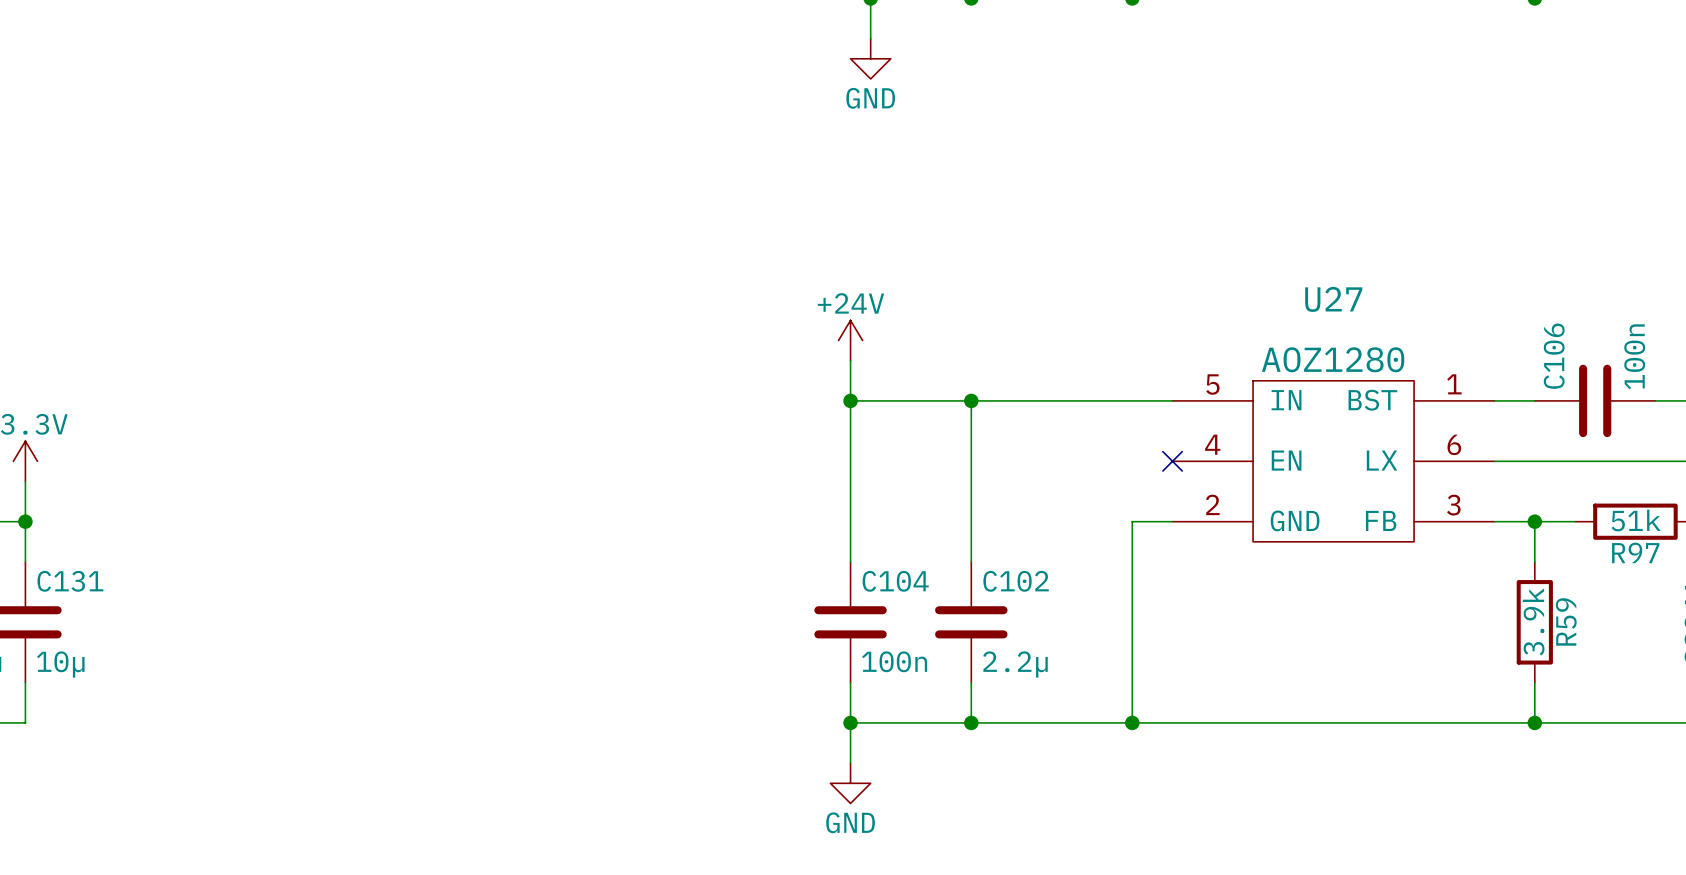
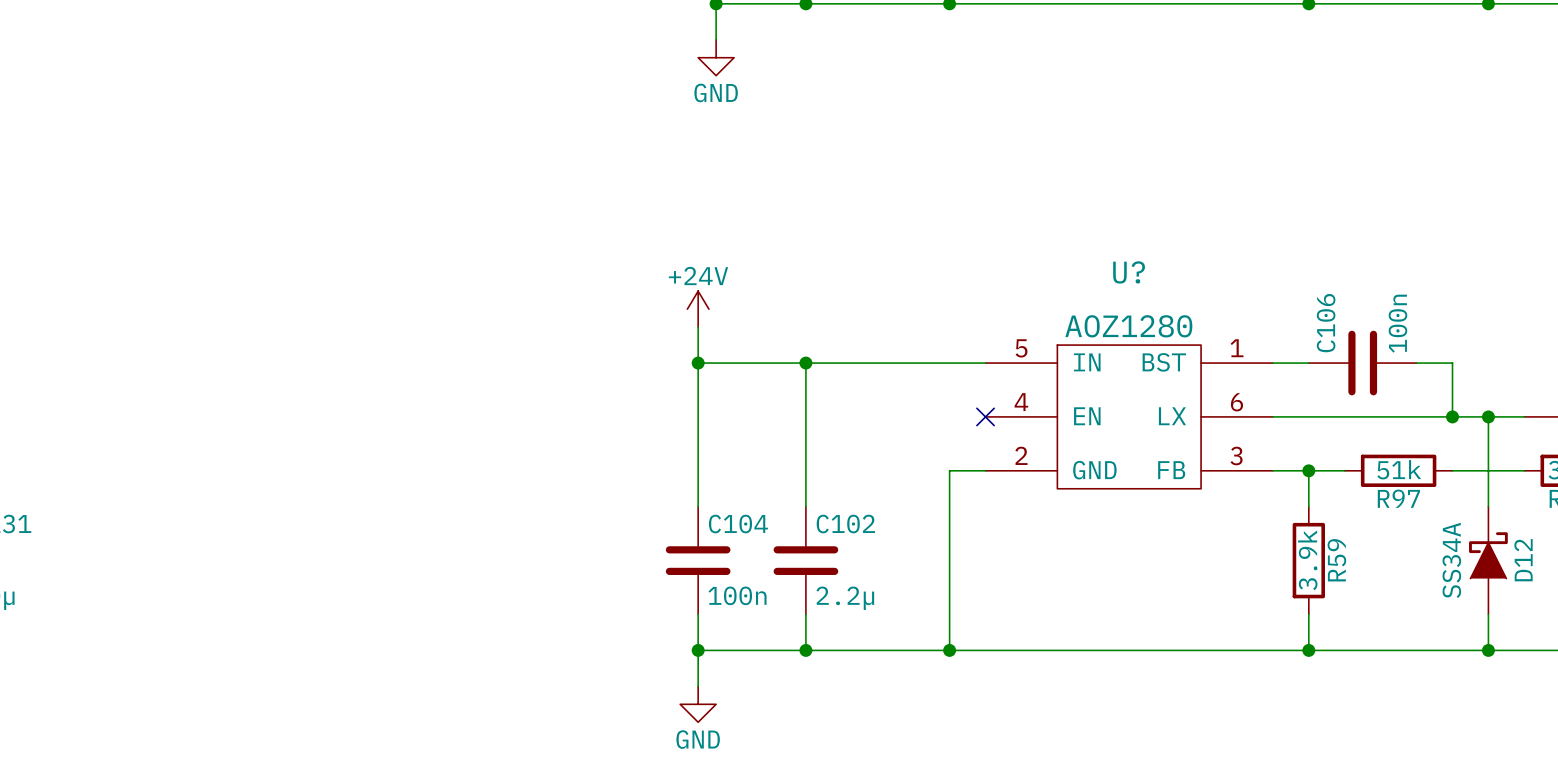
U27 name: U27 (1333, 299) -> U? (1129, 272)

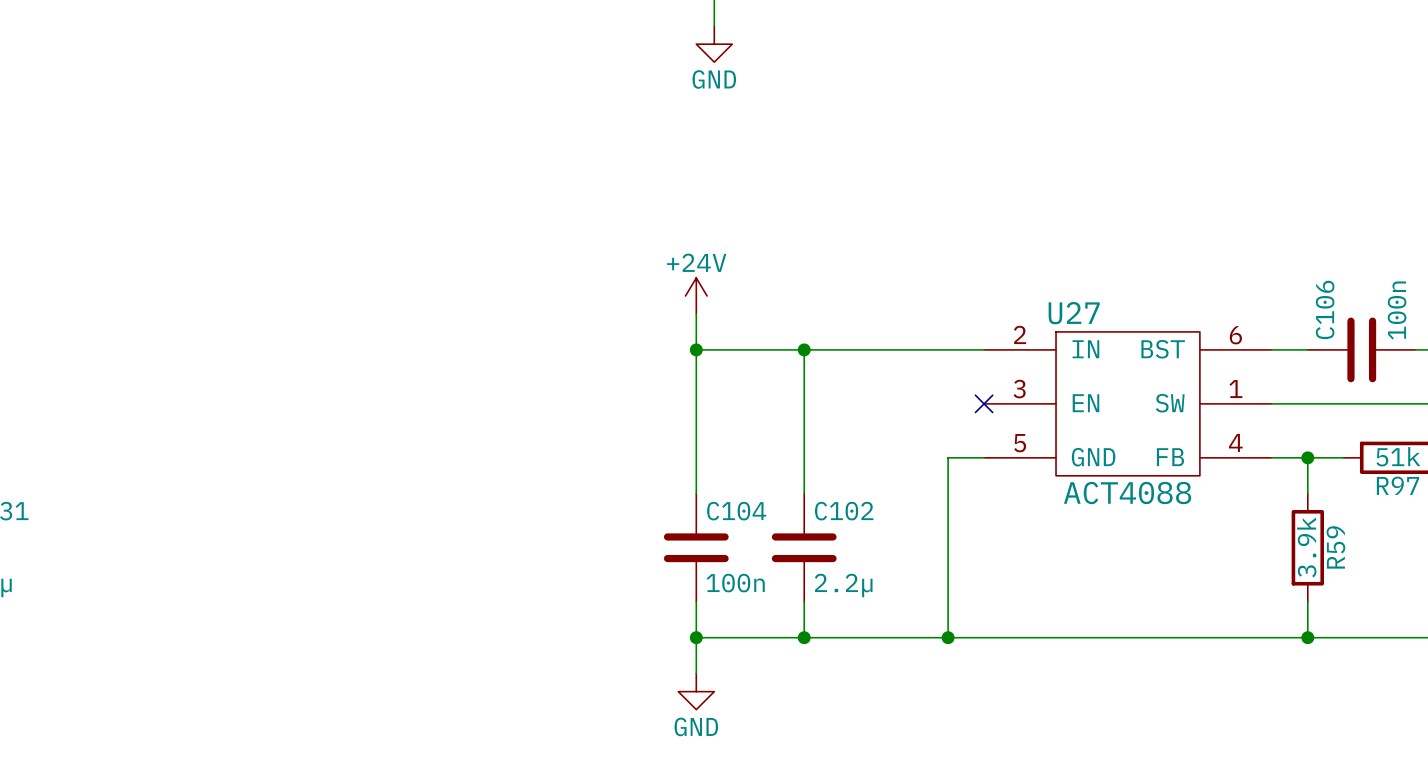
U? name: U? (1129, 272) -> U27 (1074, 313)
U? value: AOZ1280 (1128, 326) -> ACT4088 (1127, 493)
U? pin number: 5 (1021, 348) -> 2 (1020, 334)
U? pin number: 1 (1237, 348) -> 6 (1235, 335)
U? pin number: 4 (1021, 402) -> 3 (1019, 389)
U? pin number: 6 (1236, 402) -> 1 (1235, 389)
U? pin name: LX (1172, 416) -> SW (1170, 403)
U? pin number: 2 (1021, 455) -> 5 (1020, 443)
U? pin number: 3 (1236, 455) -> 4 (1235, 443)

